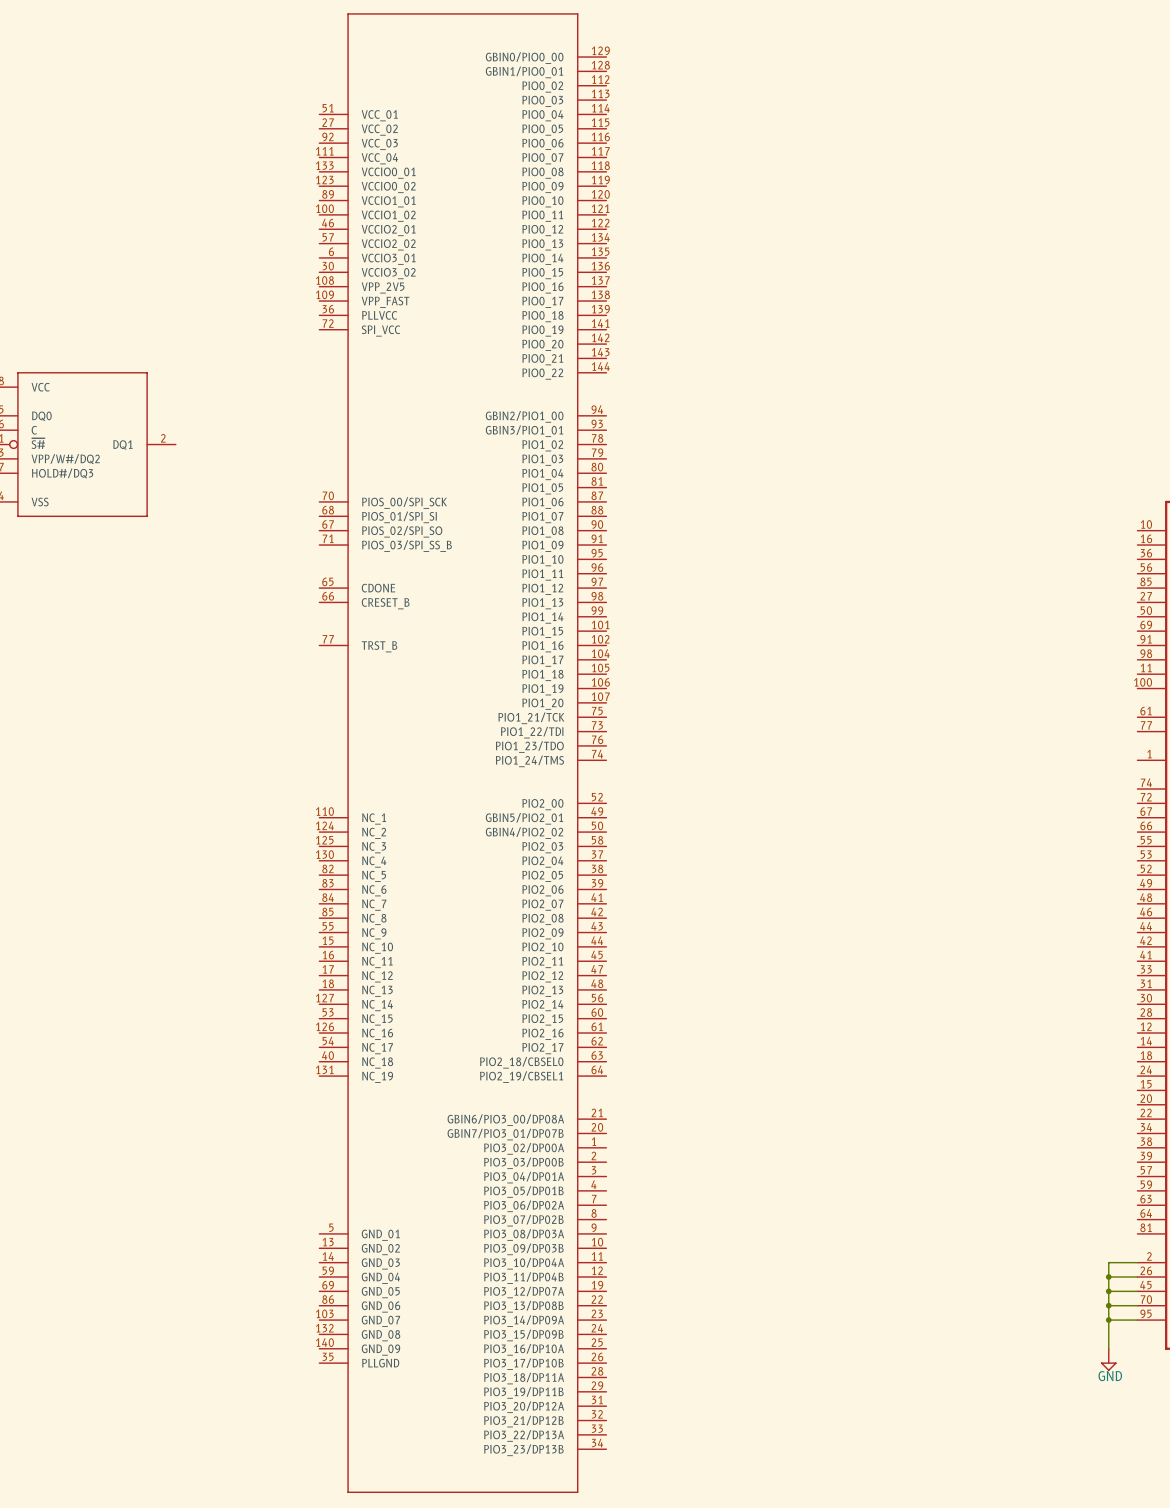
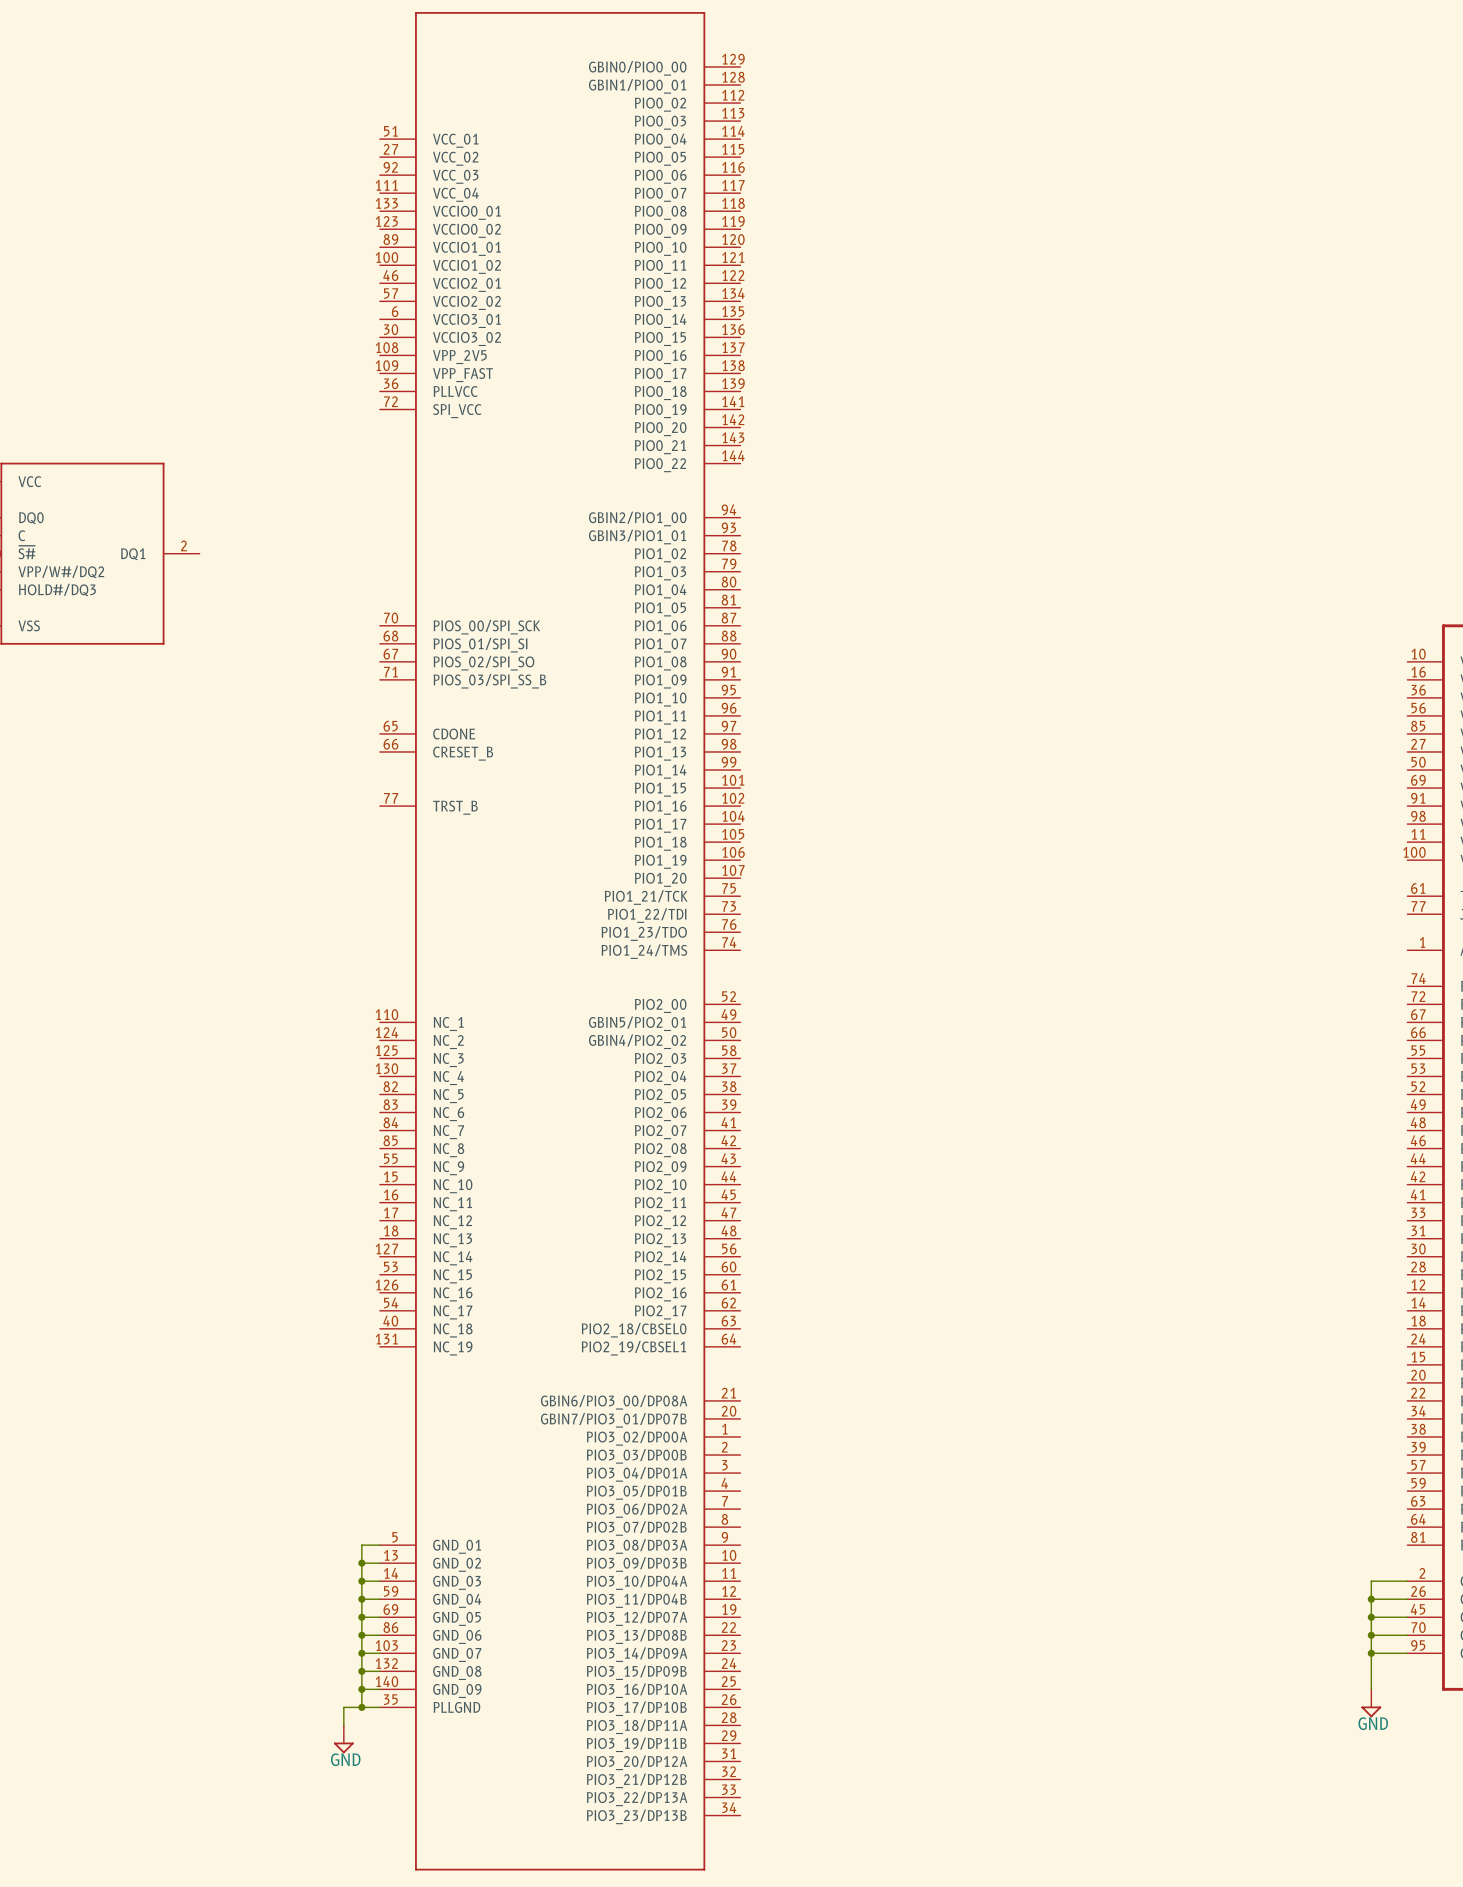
wire: none -> (379, 1545) (361, 1545) (361, 1707)
wire: none -> (361, 1563) (379, 1563)
junction: none -> (361, 1563)
wire: none -> (361, 1581) (379, 1581)
junction: none -> (361, 1581)
wire: none -> (361, 1599) (379, 1599)
junction: none -> (361, 1599)
wire: none -> (361, 1617) (379, 1617)
junction: none -> (361, 1617)
wire: none -> (361, 1635) (379, 1635)
junction: none -> (361, 1635)
wire: none -> (361, 1653) (379, 1653)
junction: none -> (361, 1653)
wire: none -> (361, 1671) (379, 1671)
junction: none -> (361, 1671)
wire: none -> (361, 1689) (379, 1689)
junction: none -> (361, 1689)
junction: none -> (361, 1707)
wire: none -> (379, 1707) (343, 1707) (343, 1725)
power symbol: none -> GND (343, 1739)

